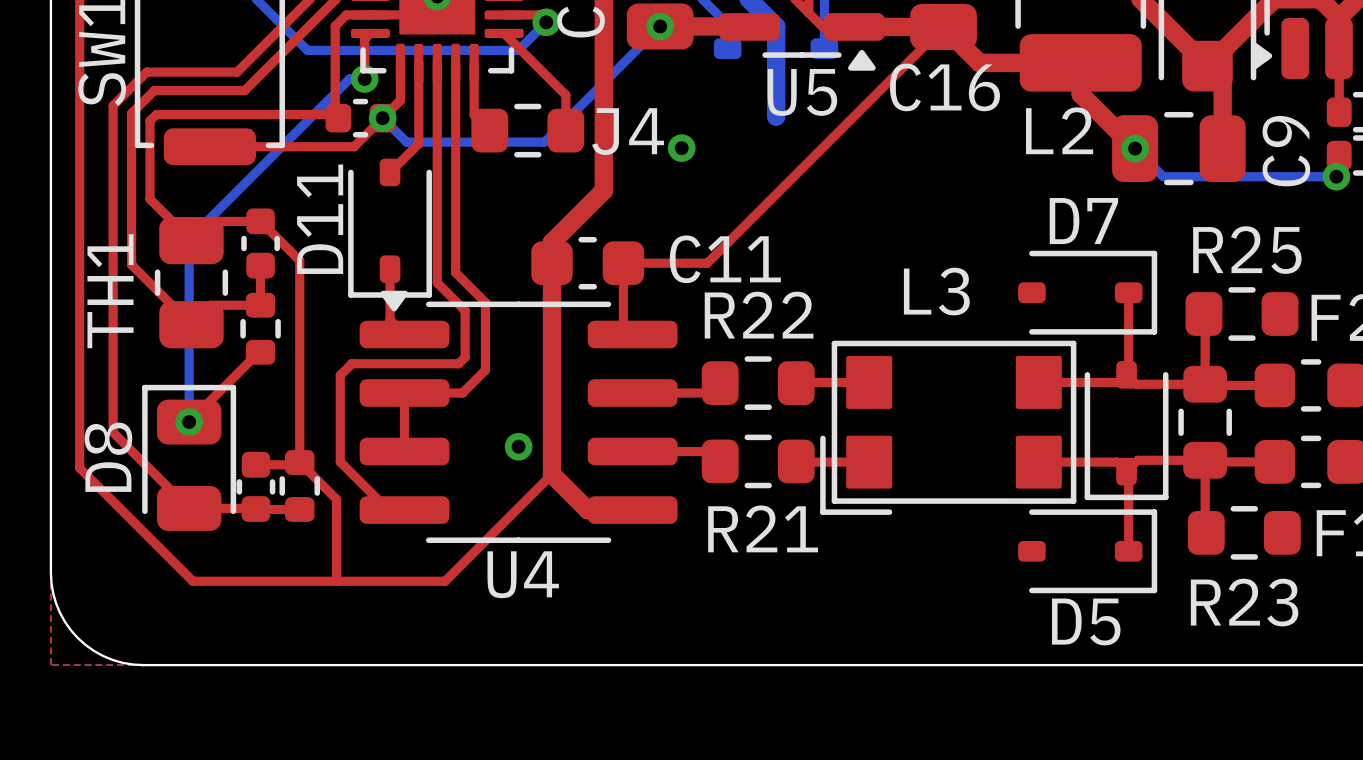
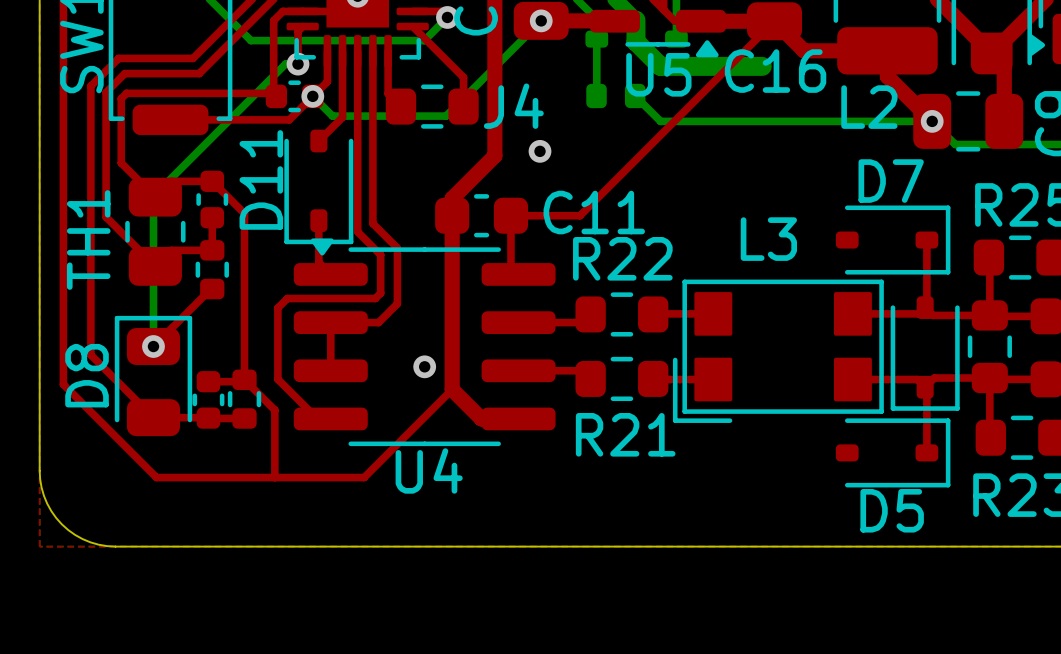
bottom track: (775, 25) (776, 116) -> (635, 20) (635, 41) (660, 66) (762, 66)
bottom track: none -> (596, 39) (596, 95)
part: none -> (615, 95)
bottom track: none -> (635, 95) (660, 121) (932, 121)
via position: (681, 148) -> (540, 151)

